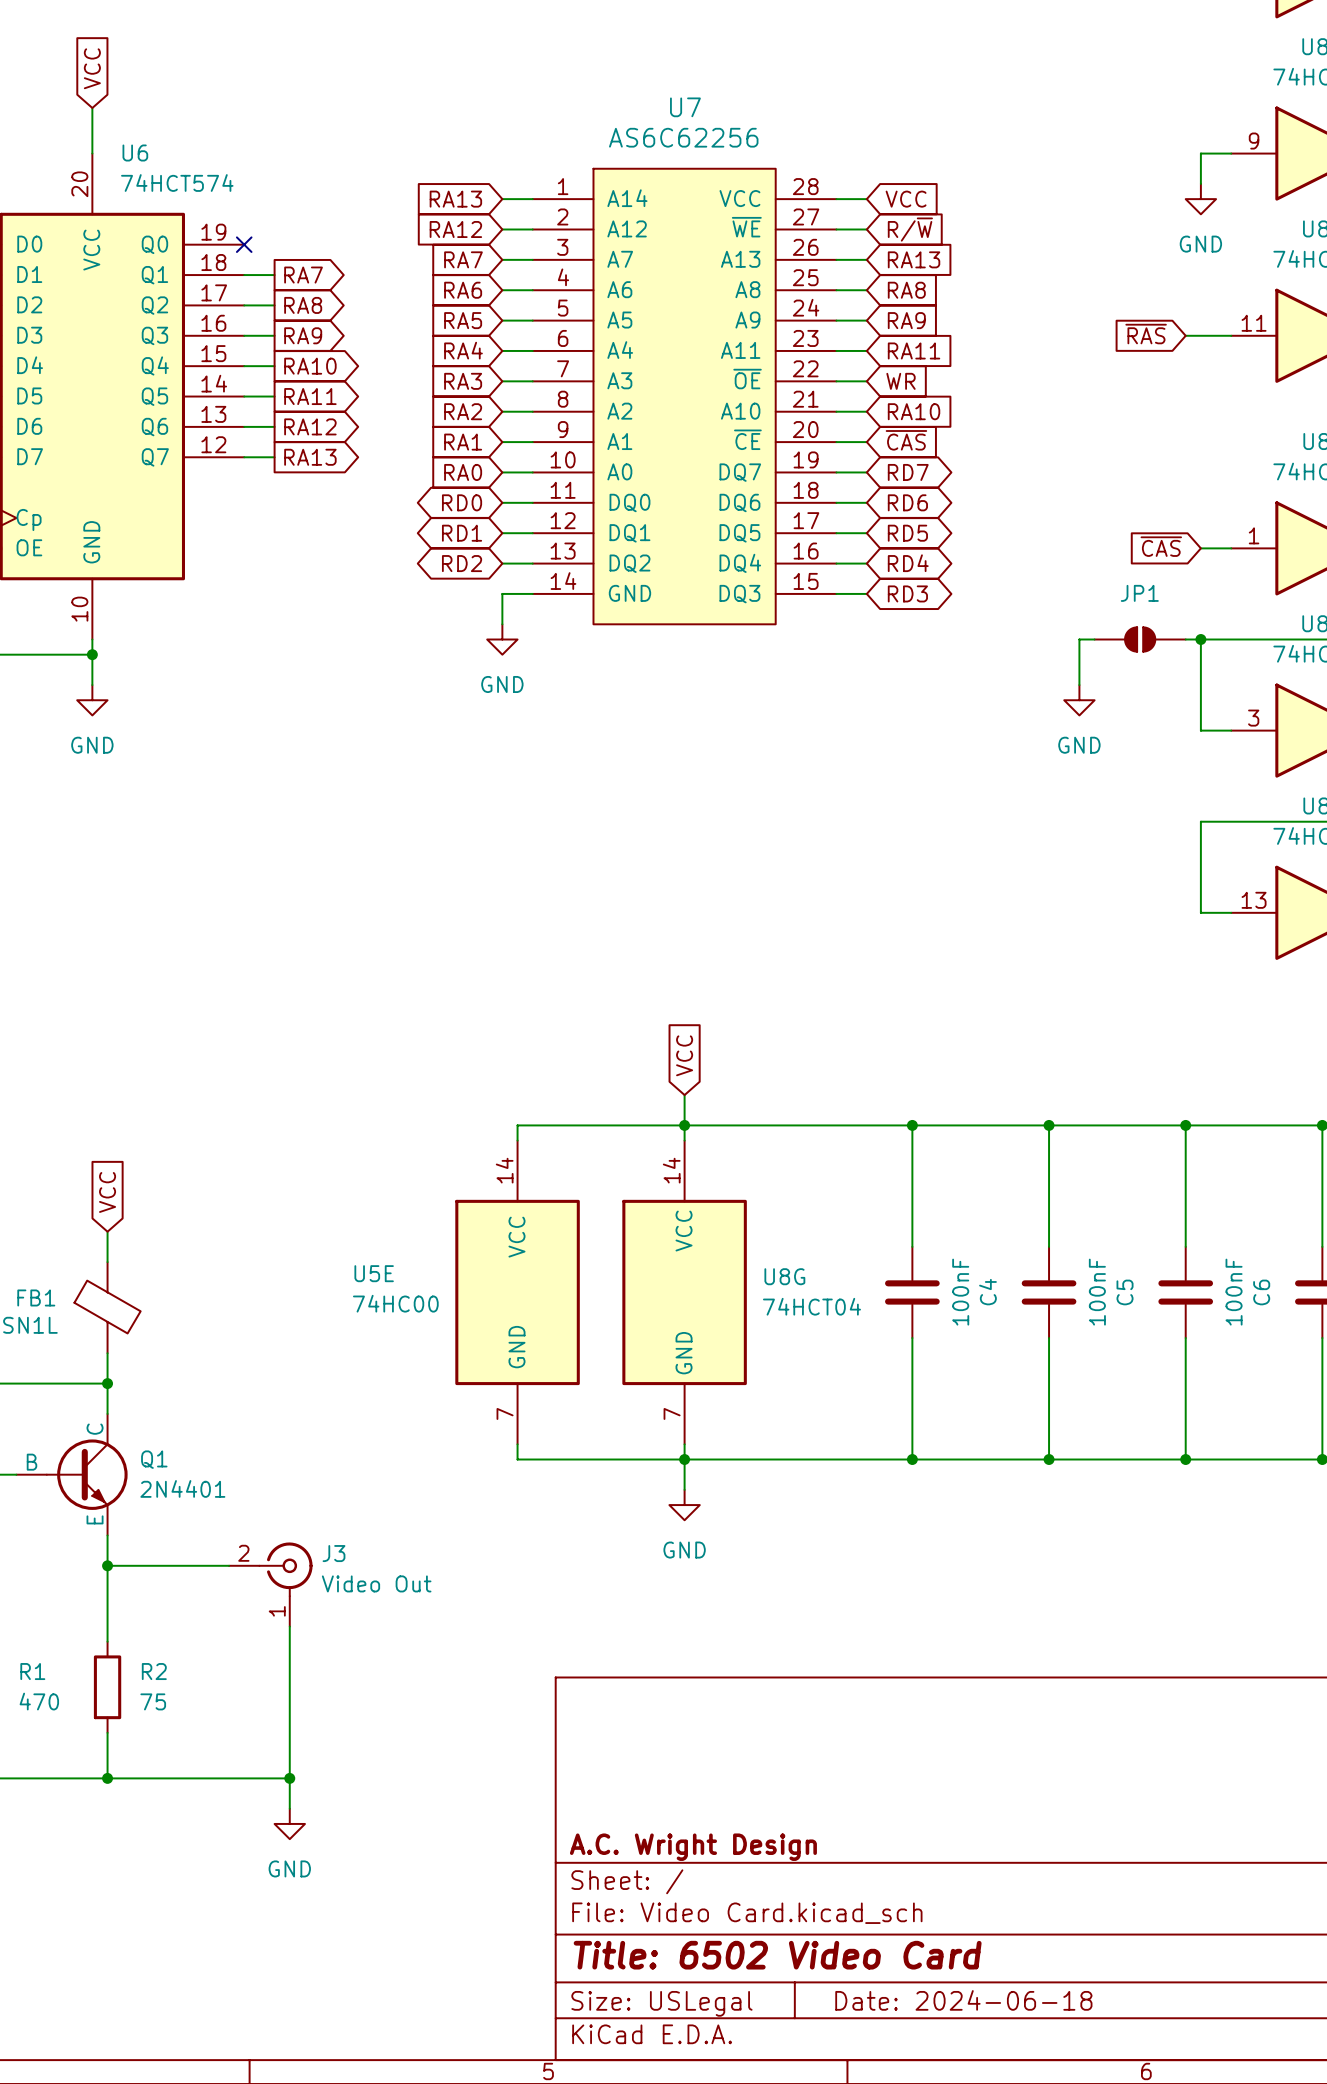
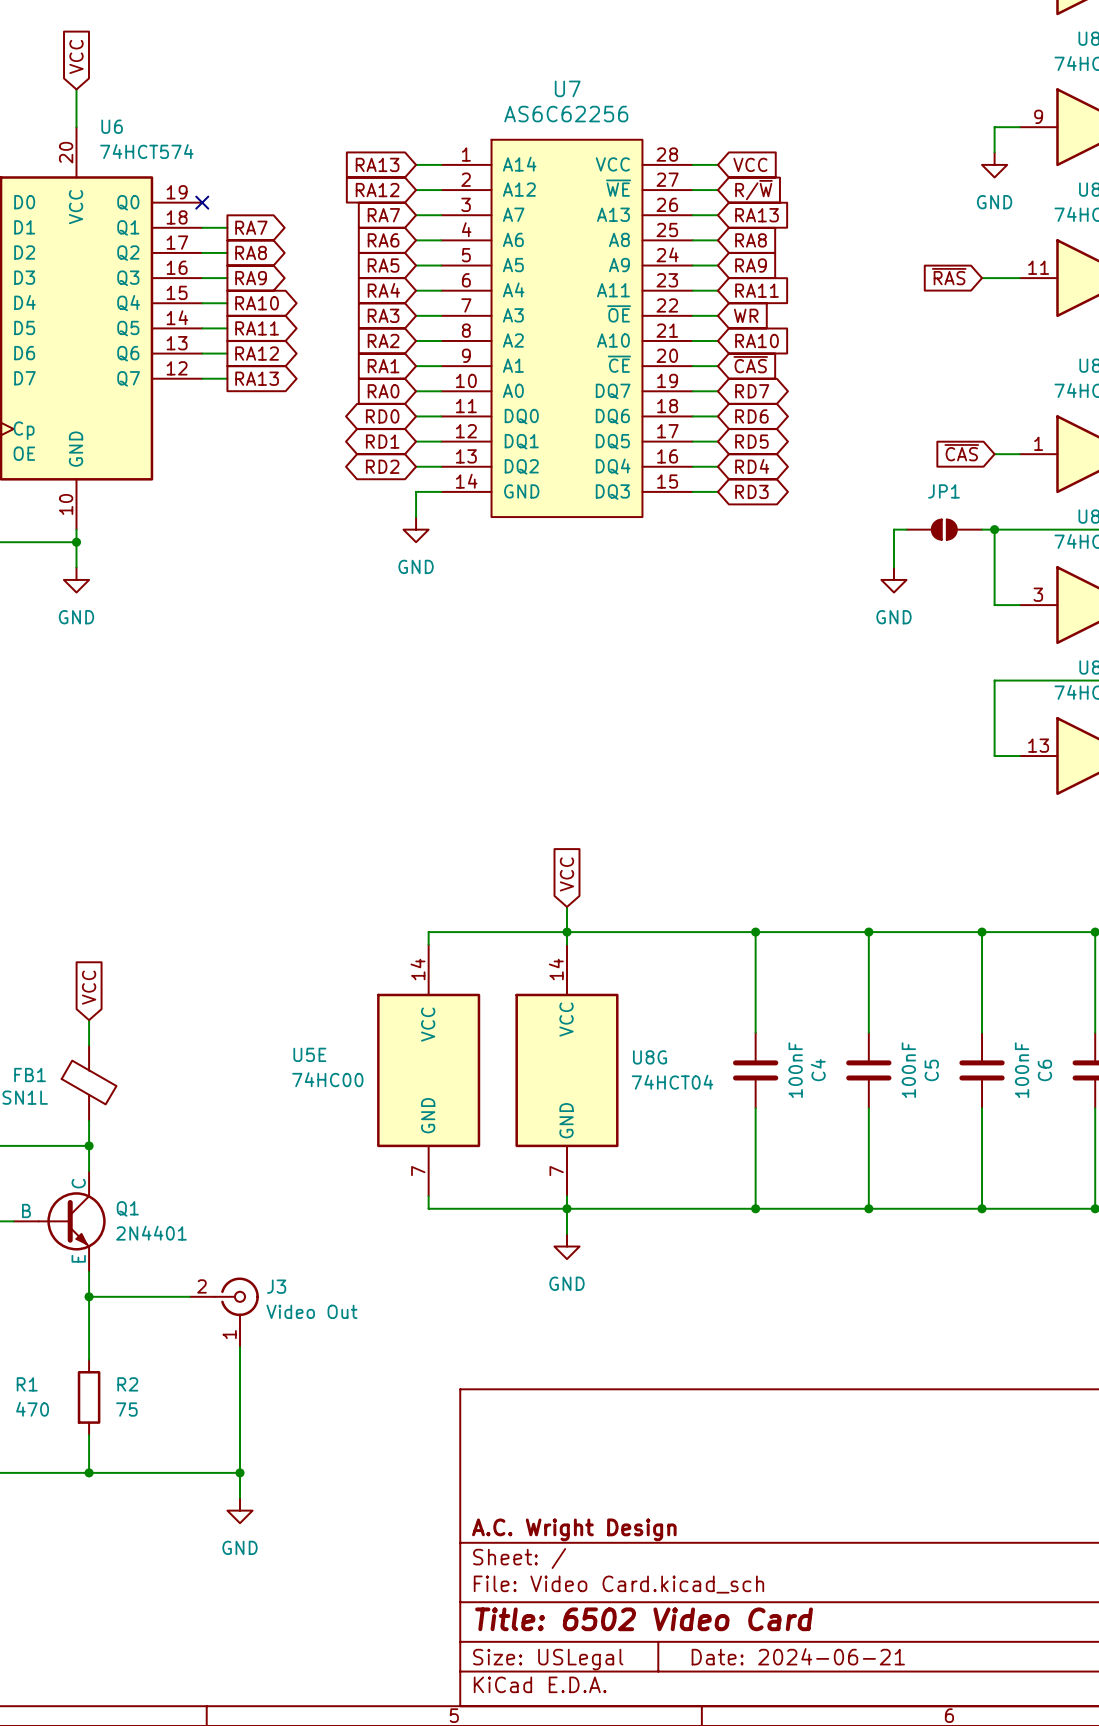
title block: Date: 2024-06-18 (963, 2000) -> Date: 2024-06-21 (798, 1656)

